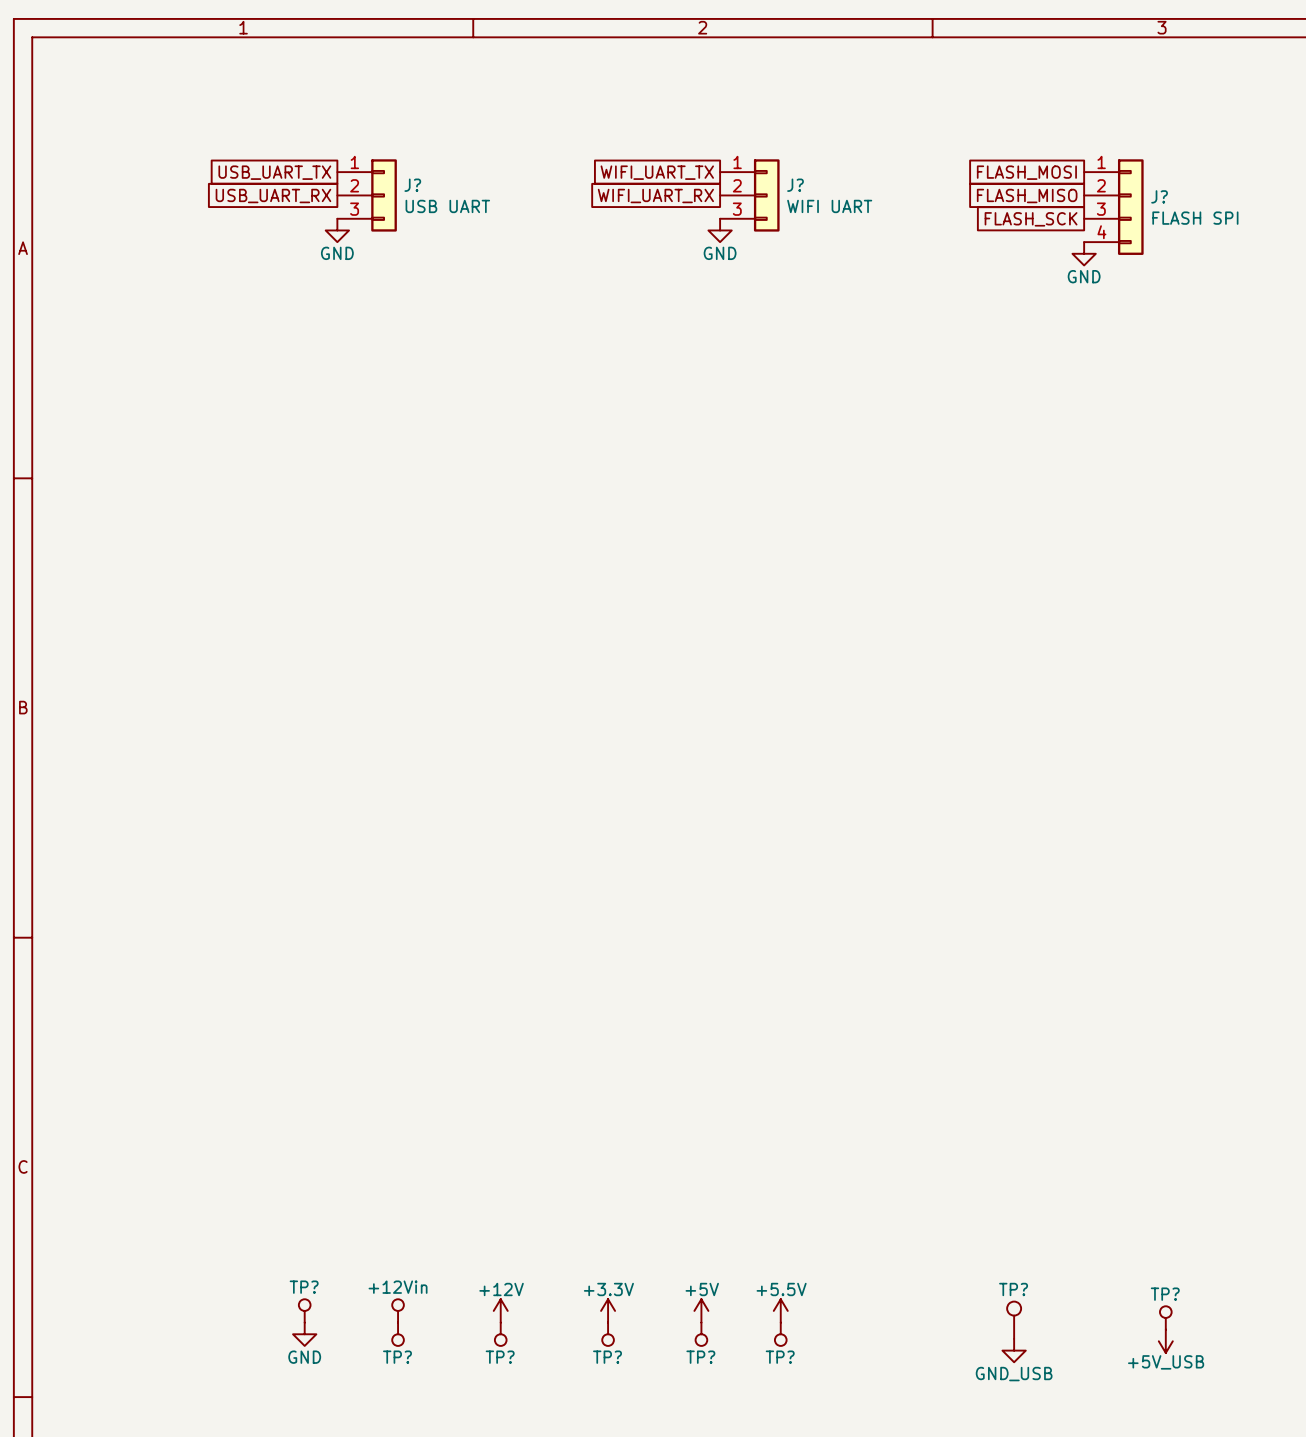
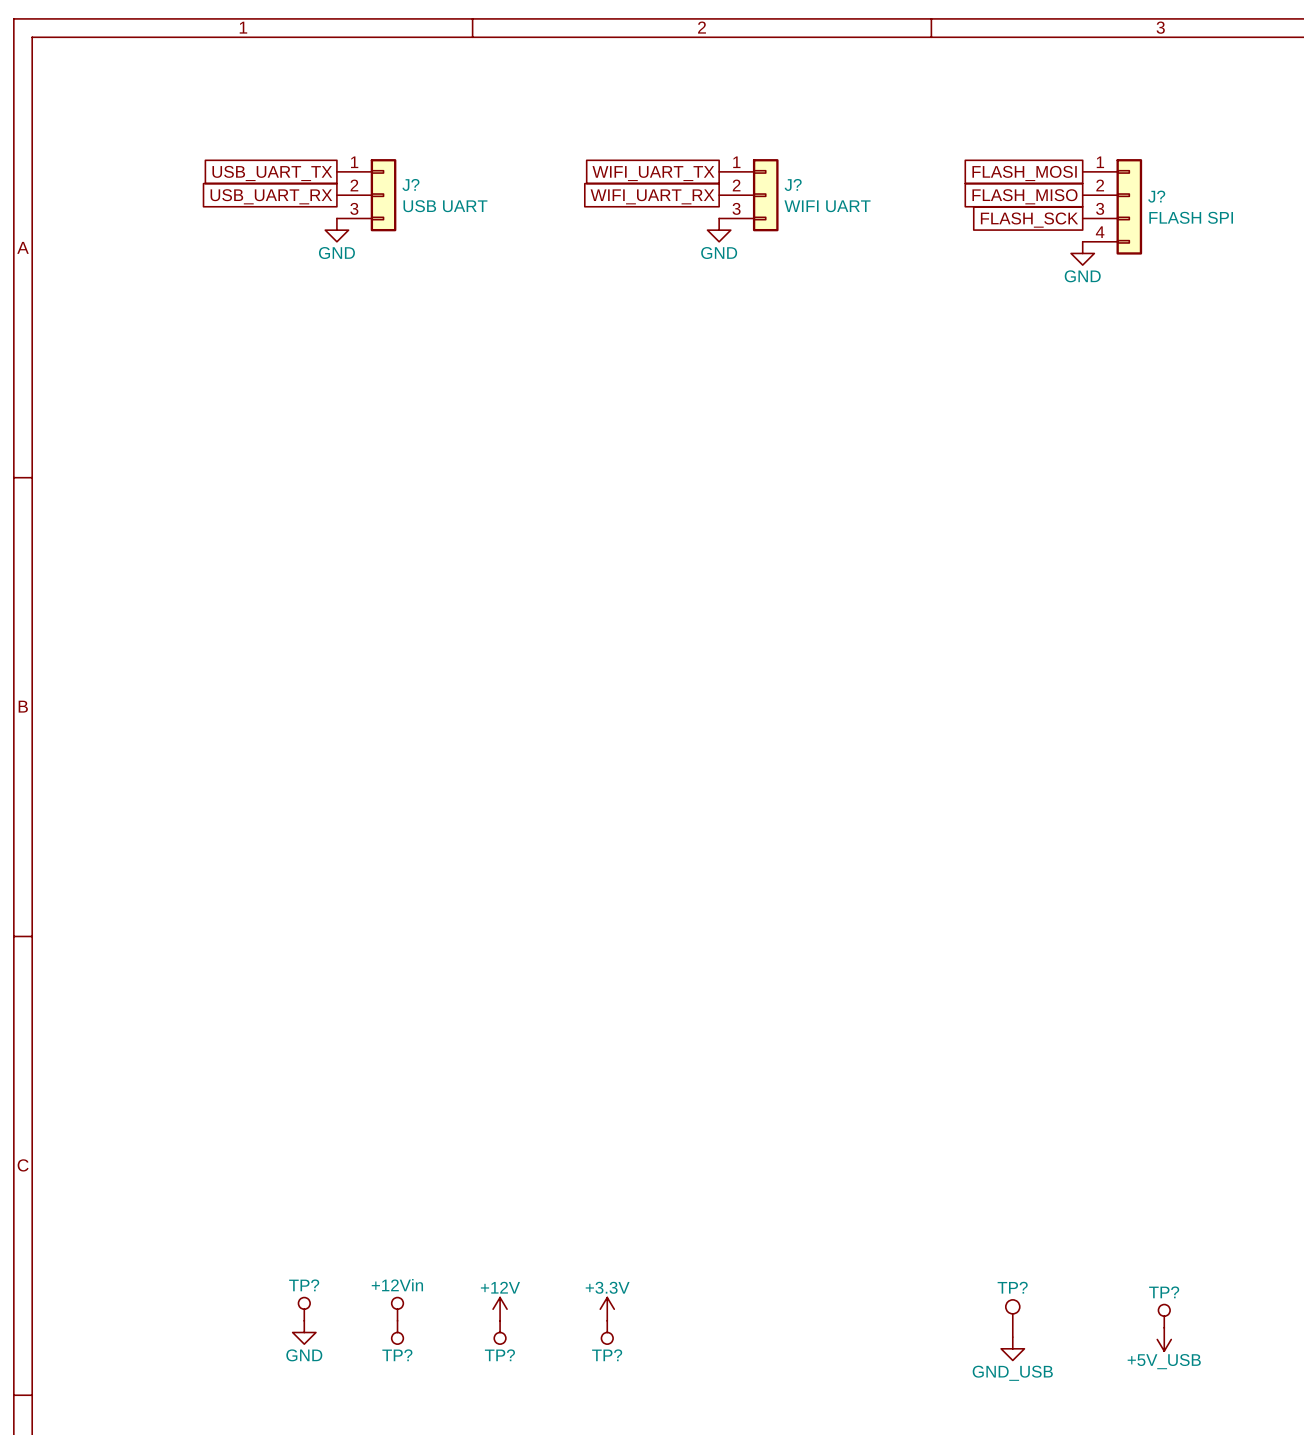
power symbol: +5V (701, 1310) -> none
power symbol: +5.5V (780, 1310) -> none
TP?: (701, 1334) -> none
TP?: (780, 1334) -> none

